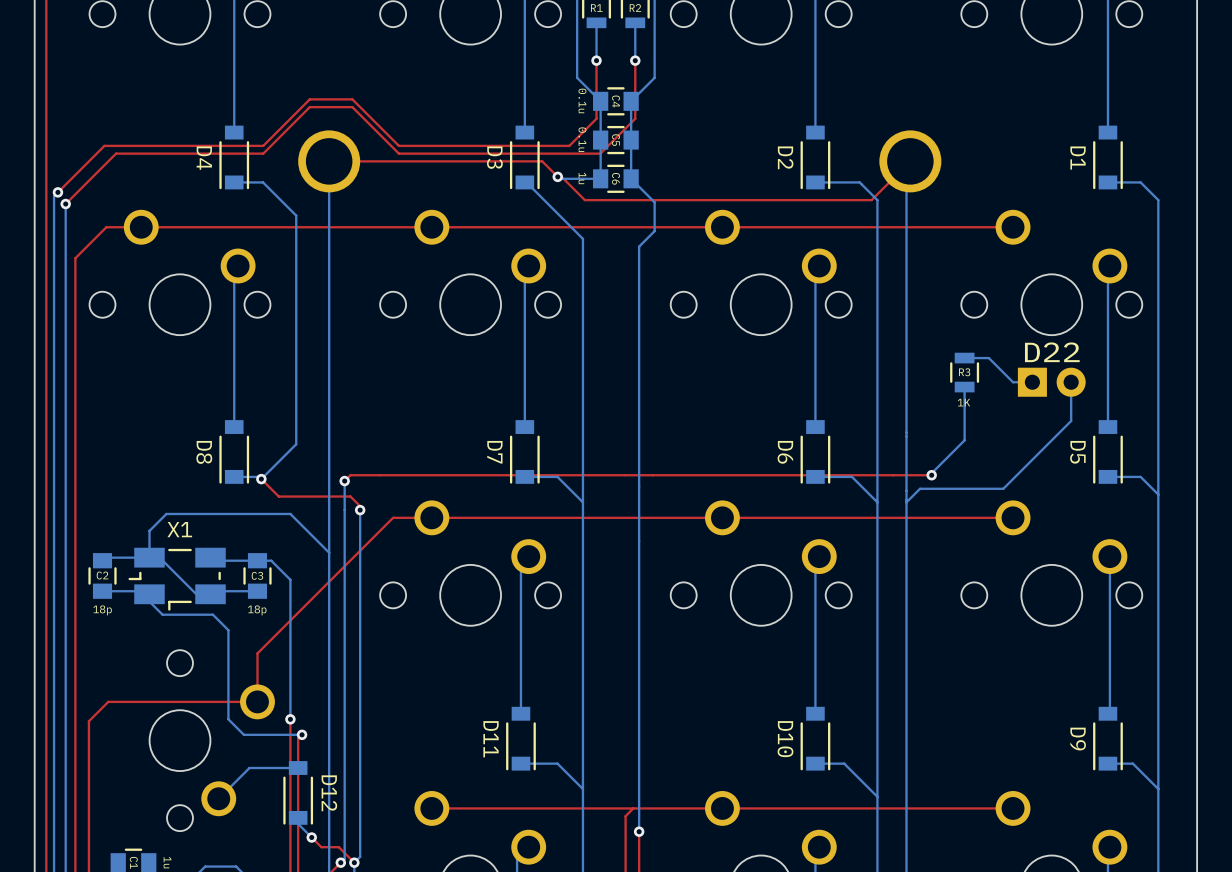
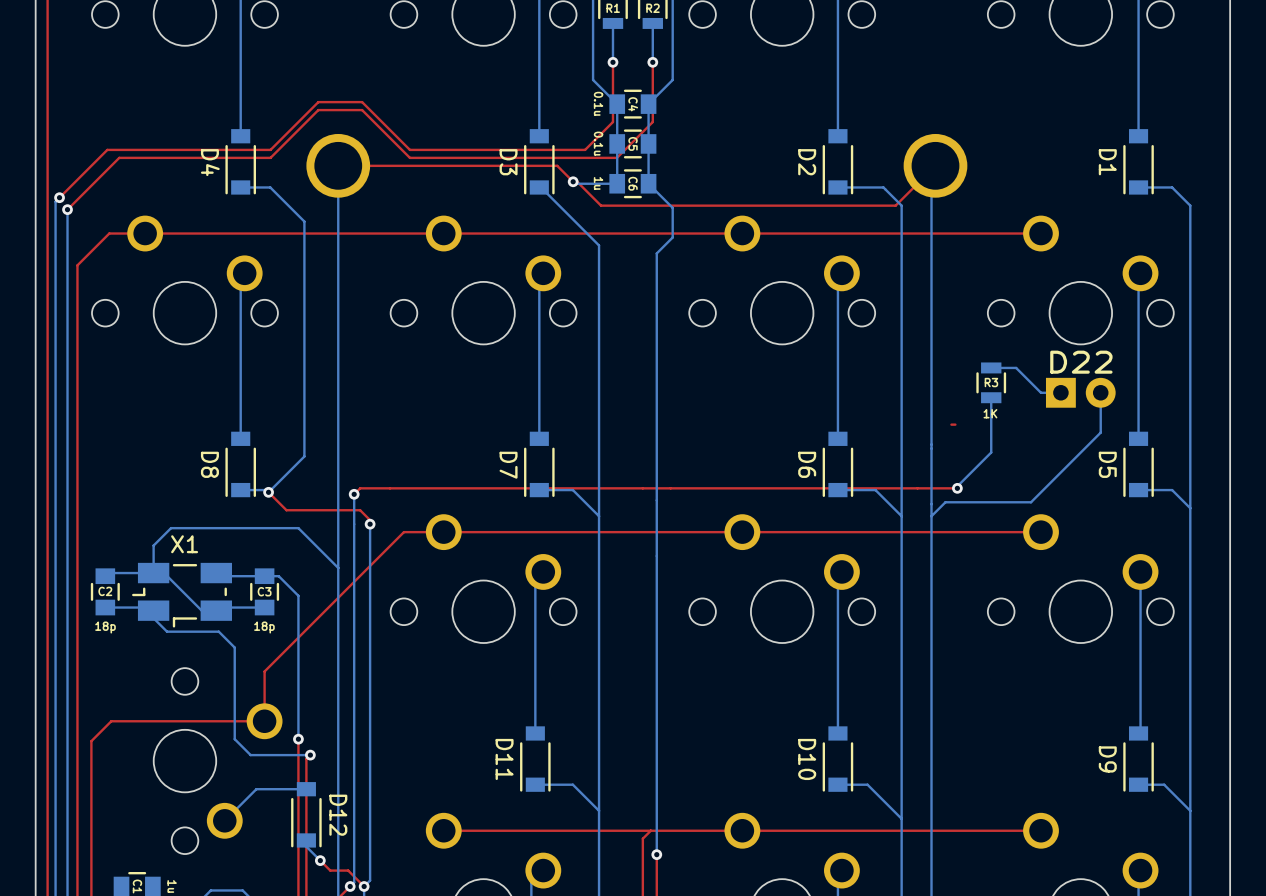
top track: none -> (955, 424) (951, 424)

